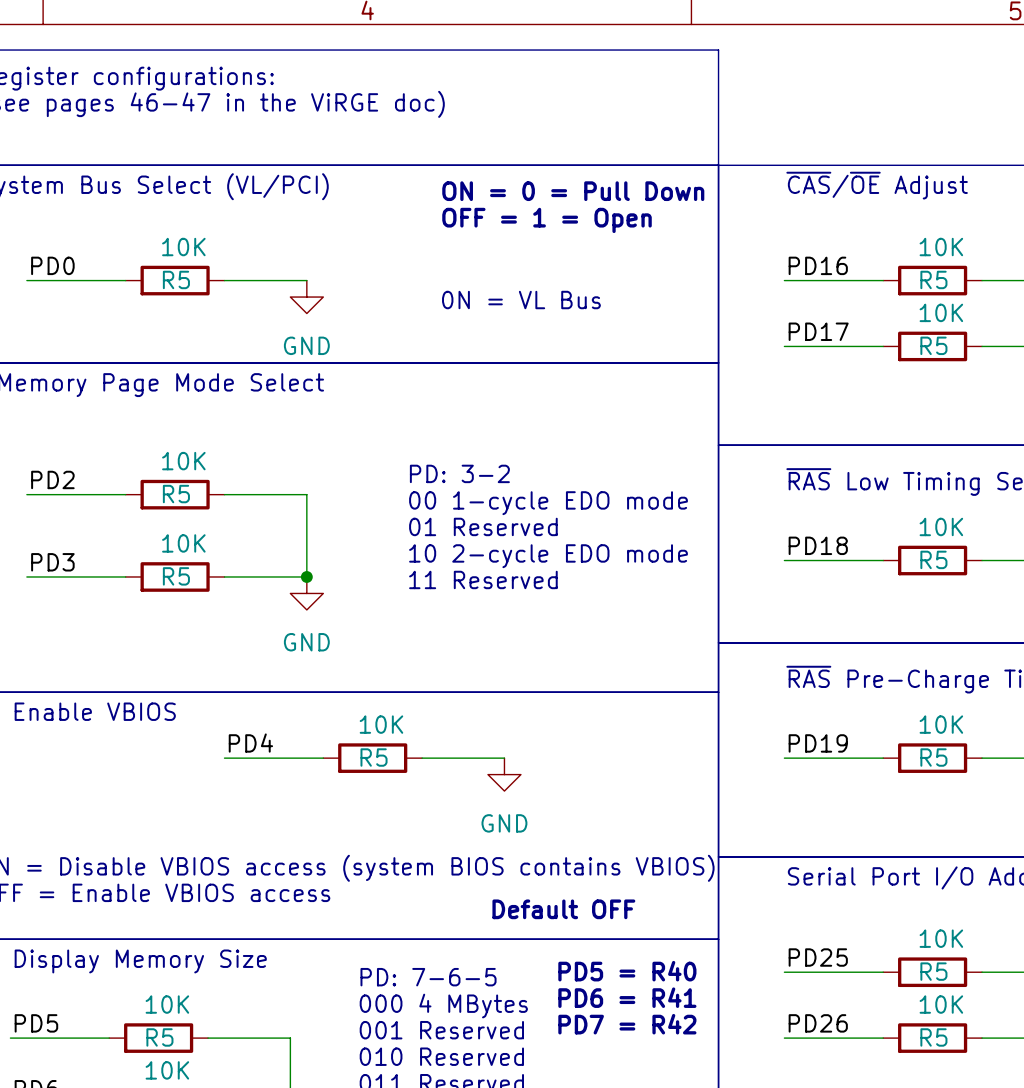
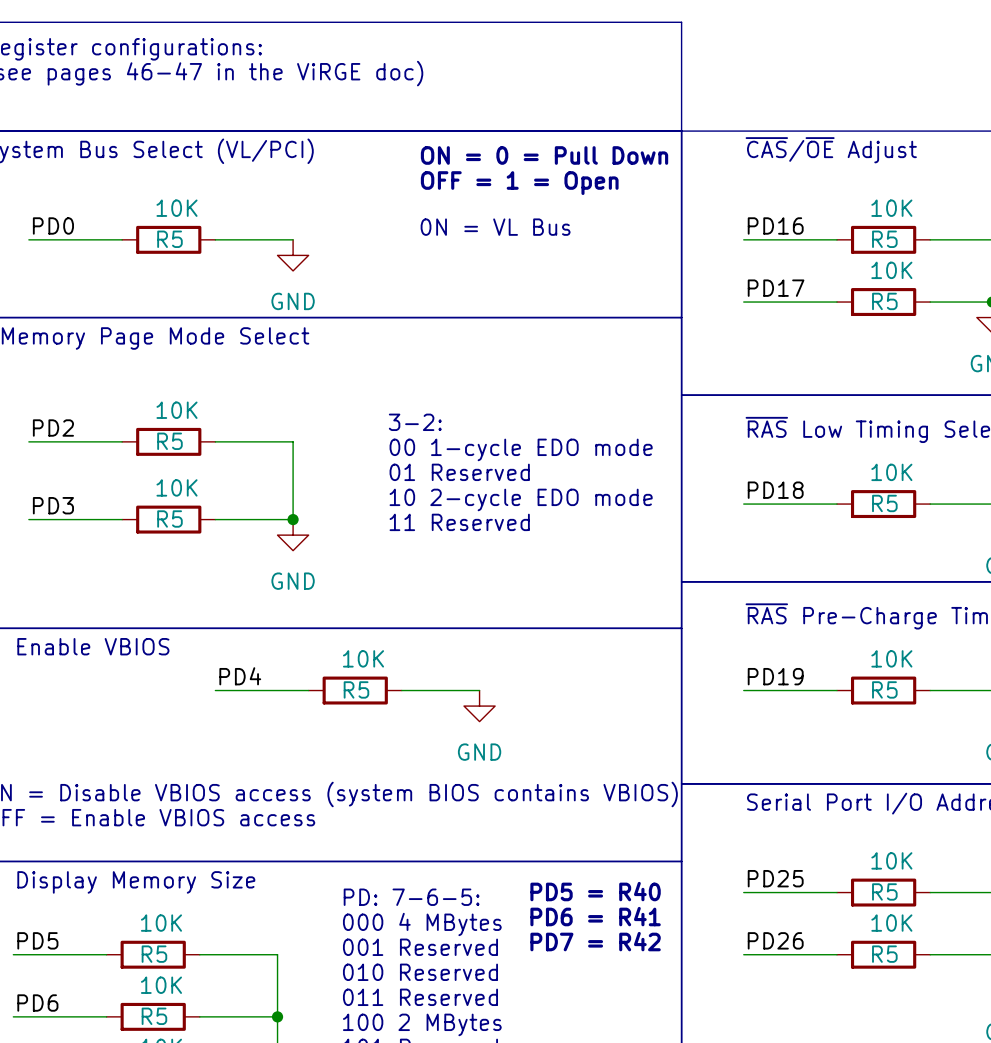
text position: 0N = VL Bus (521, 300) -> 0N = VL Bus (495, 227)
text: PD: 3-2 (459, 473) -> 3-2: (415, 422)
text: Default OFF (563, 909) -> none
text: PD: 7-6-5 (428, 977) -> PD: 7-6-5: (411, 897)

